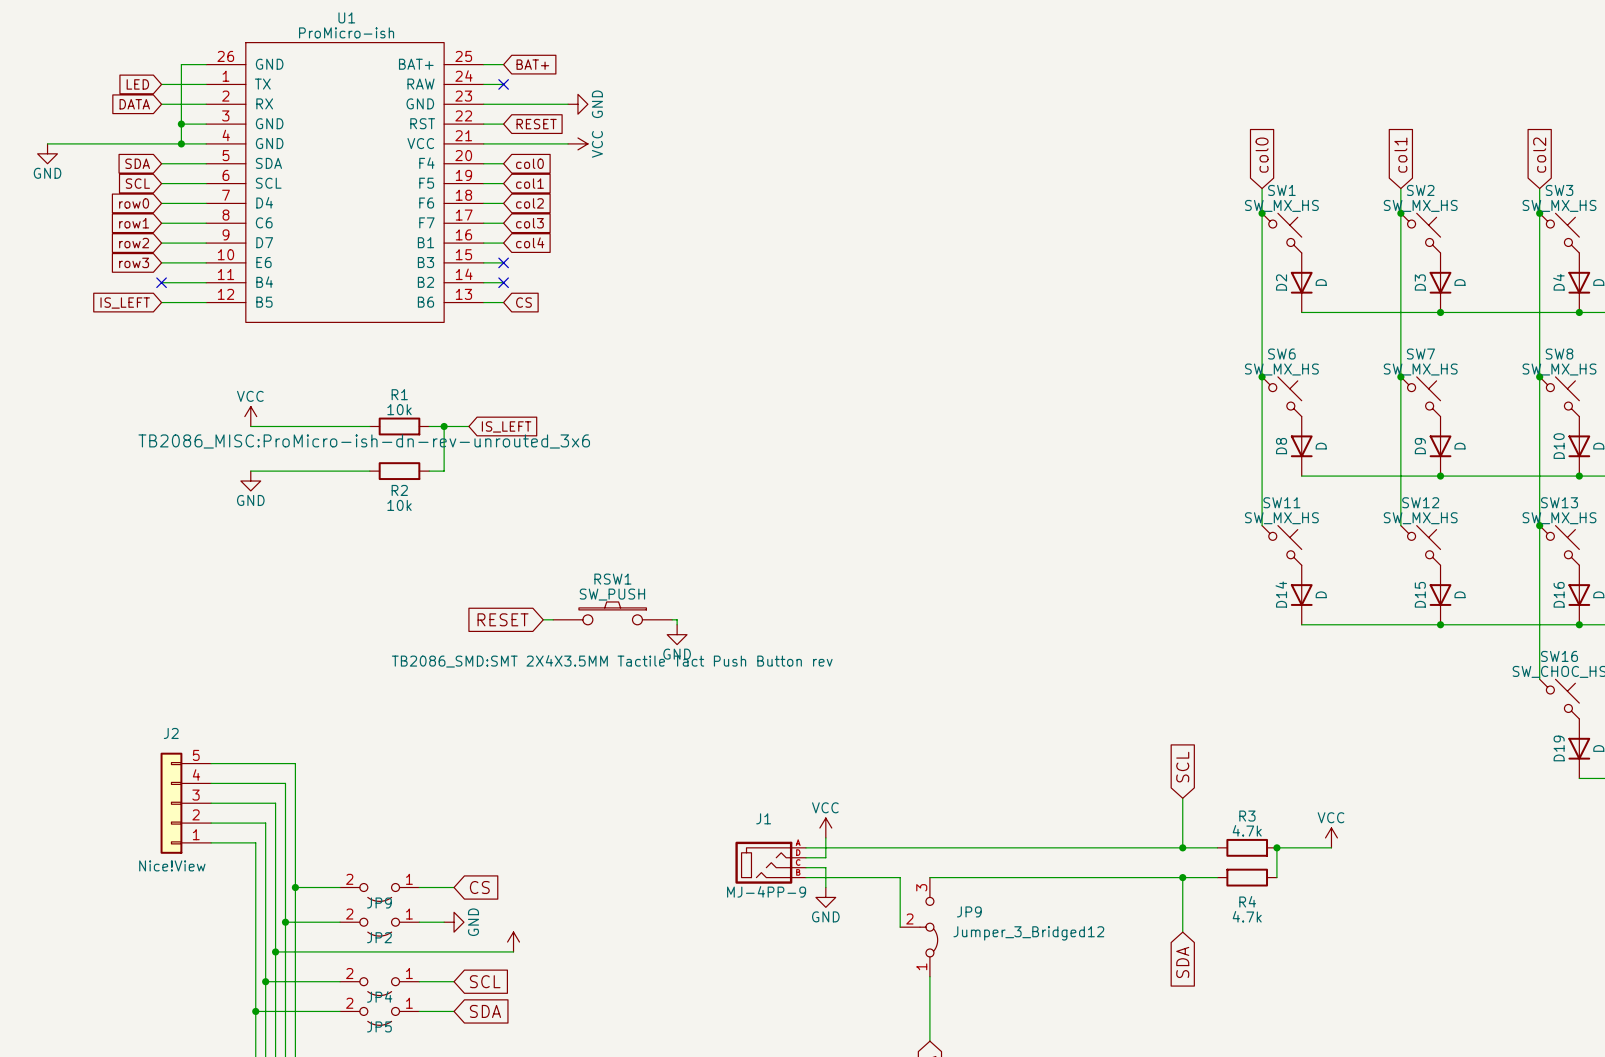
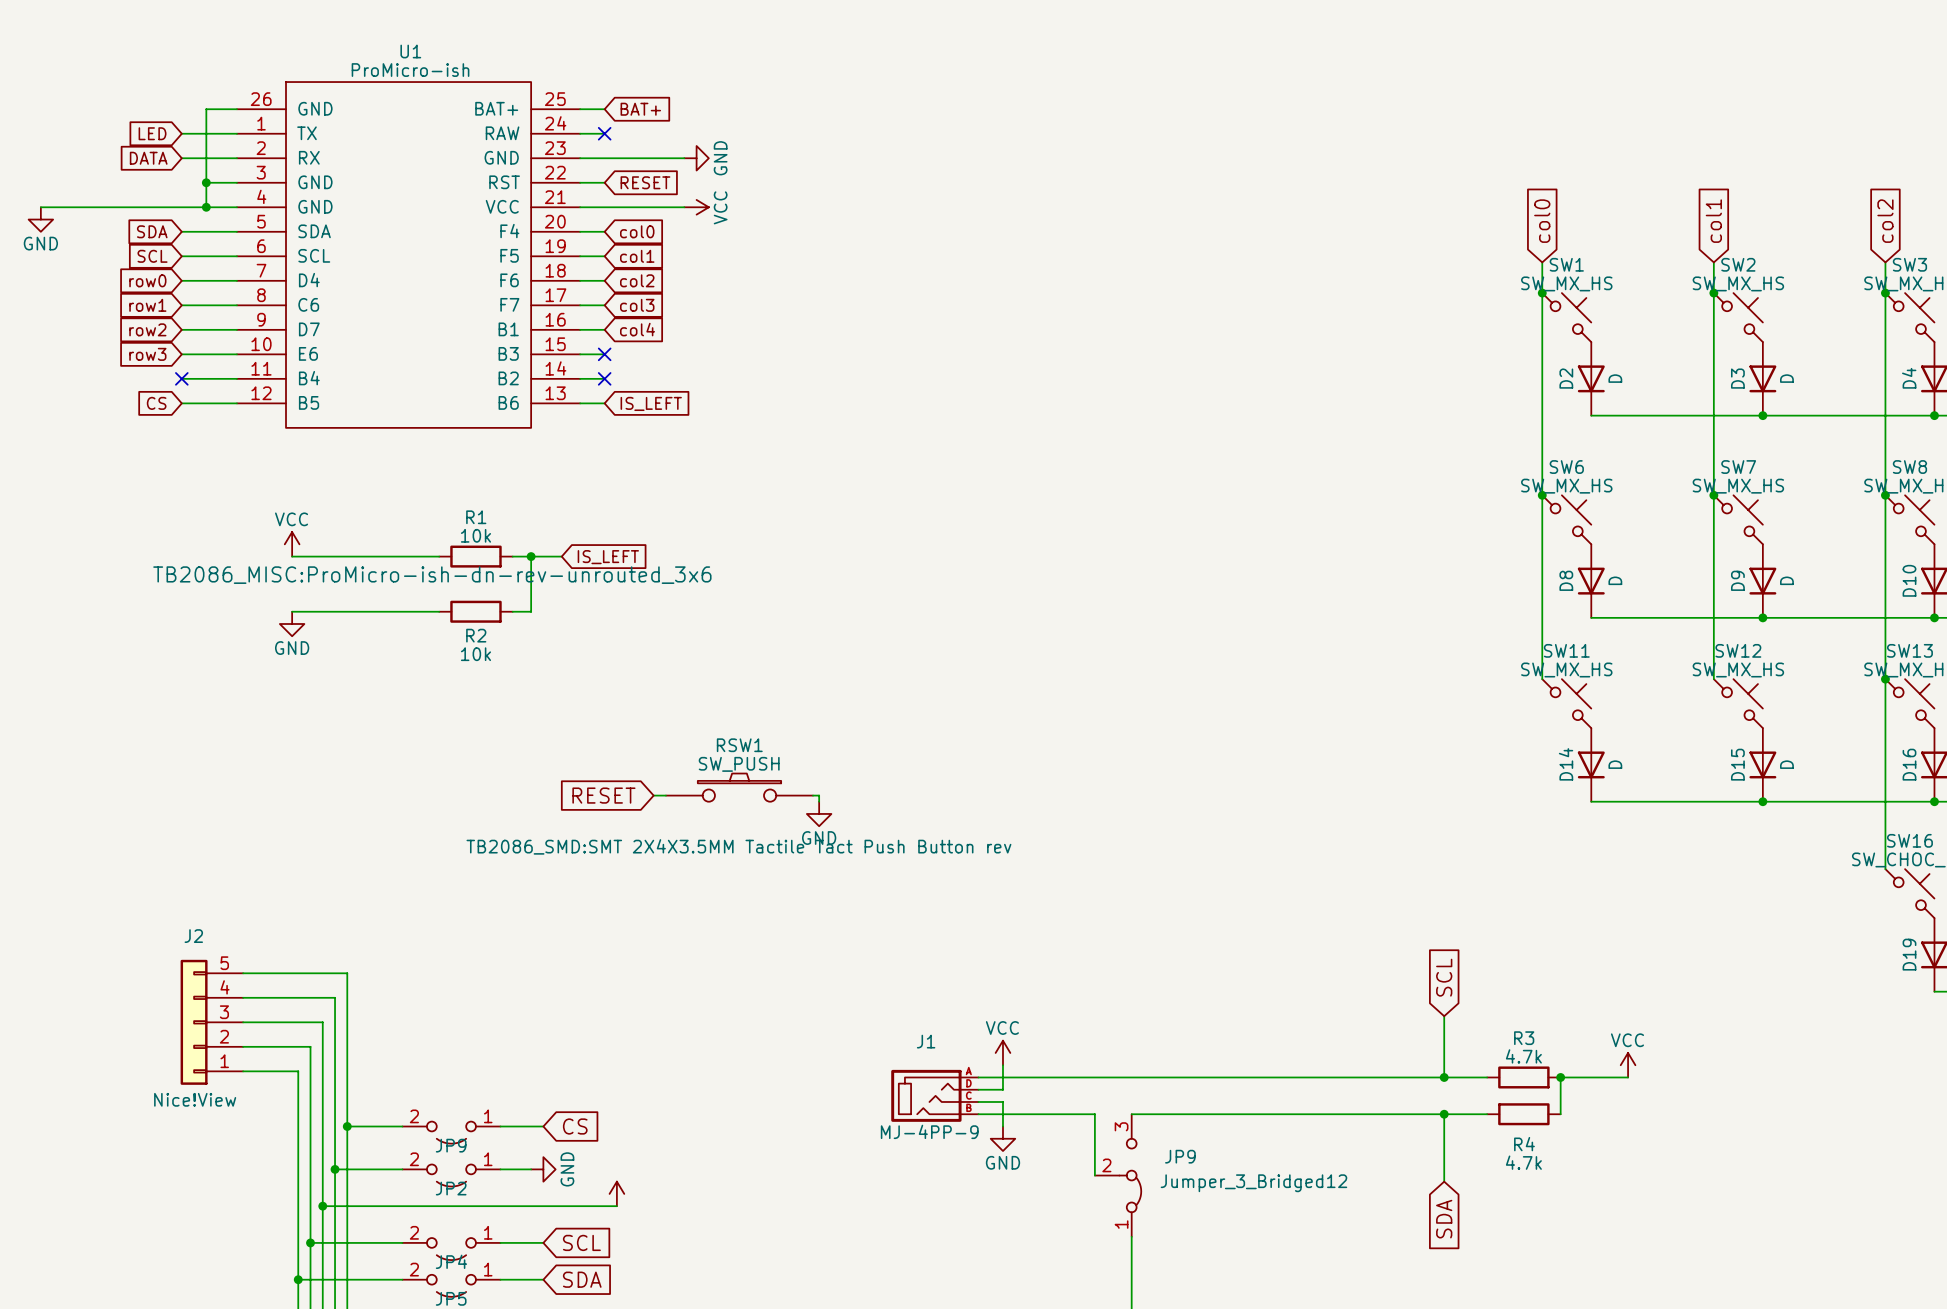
global label: CS (523, 302) -> IS_LEFT (651, 403)
global label: IS_LEFT (125, 303) -> CS (156, 403)

